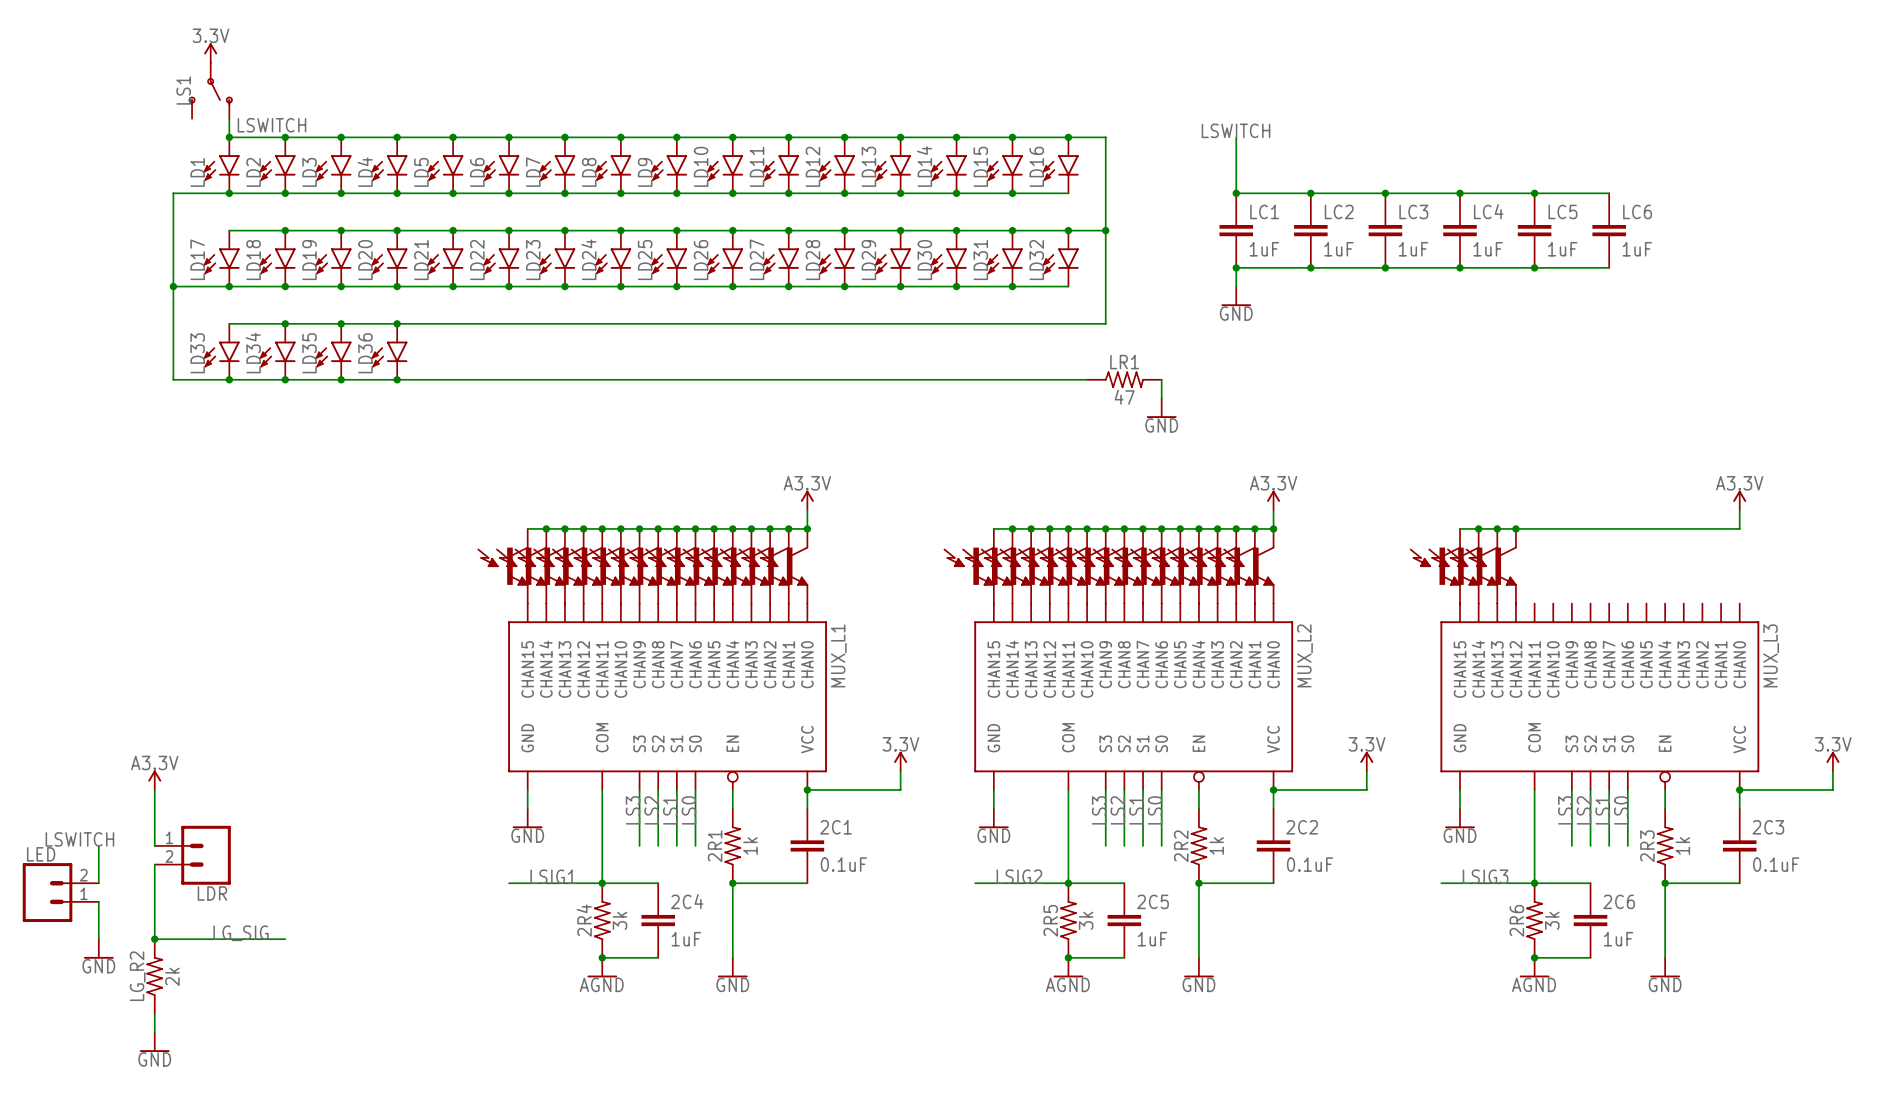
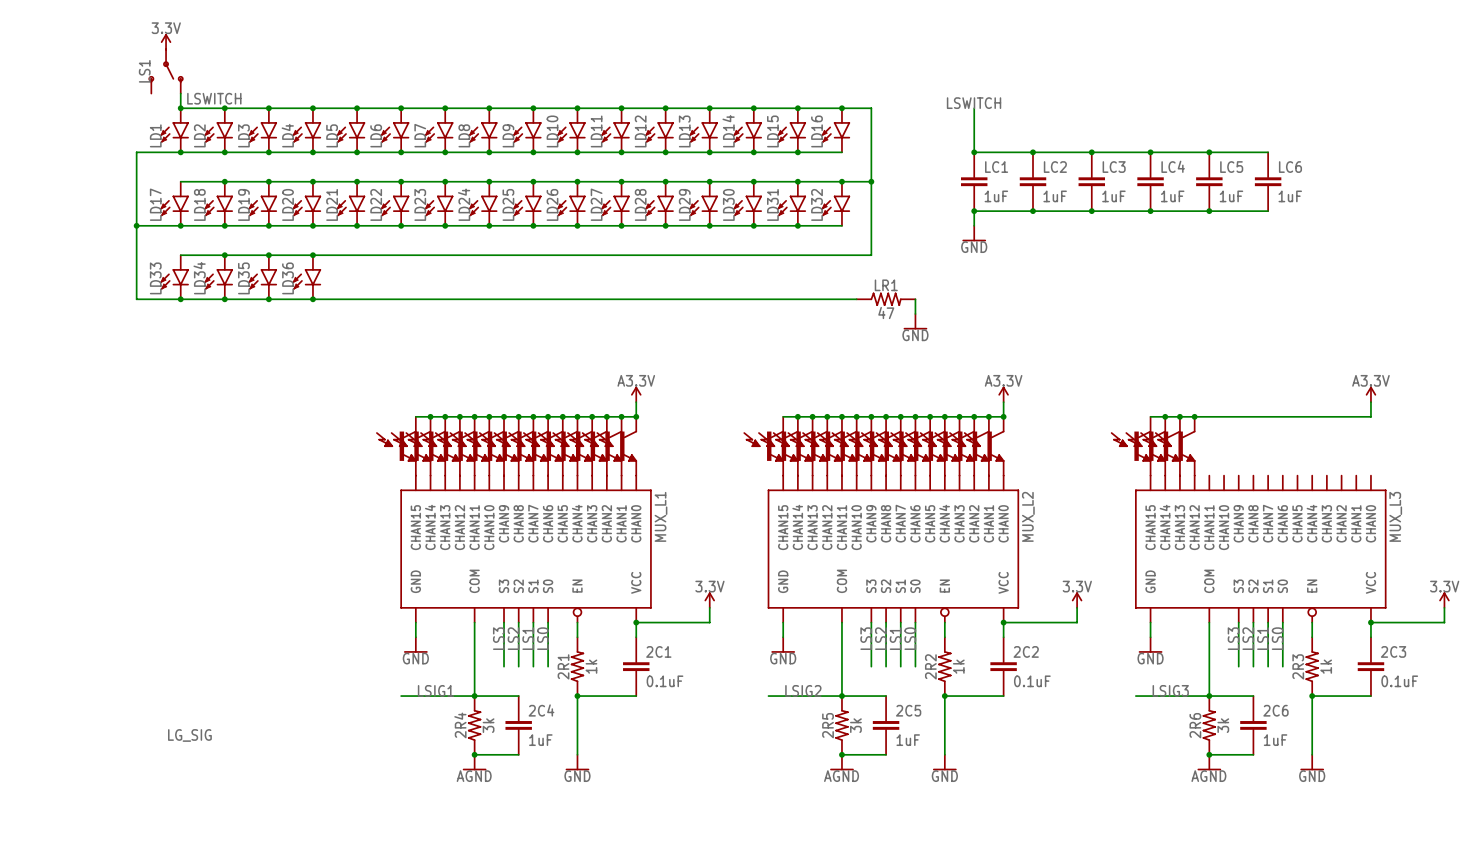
power symbol: A3.3V (154, 780) -> none
wire: (154, 790) (154, 845) -> none
label: LSWITCH (79, 839) -> none
wire: (98, 845) (98, 883) -> none
LDR: (192, 855) -> none
wire: (154, 864) (154, 939) (285, 939) -> none
LED: (60, 892) -> none
wire: (98, 901) (98, 939) -> none
junction: (154, 939) -> none
power symbol: GND (98, 948) -> none
LG_R2: 2k (154, 976) -> none
wire: (154, 1013) (154, 1032) -> none
power symbol: GND (154, 1042) -> none

